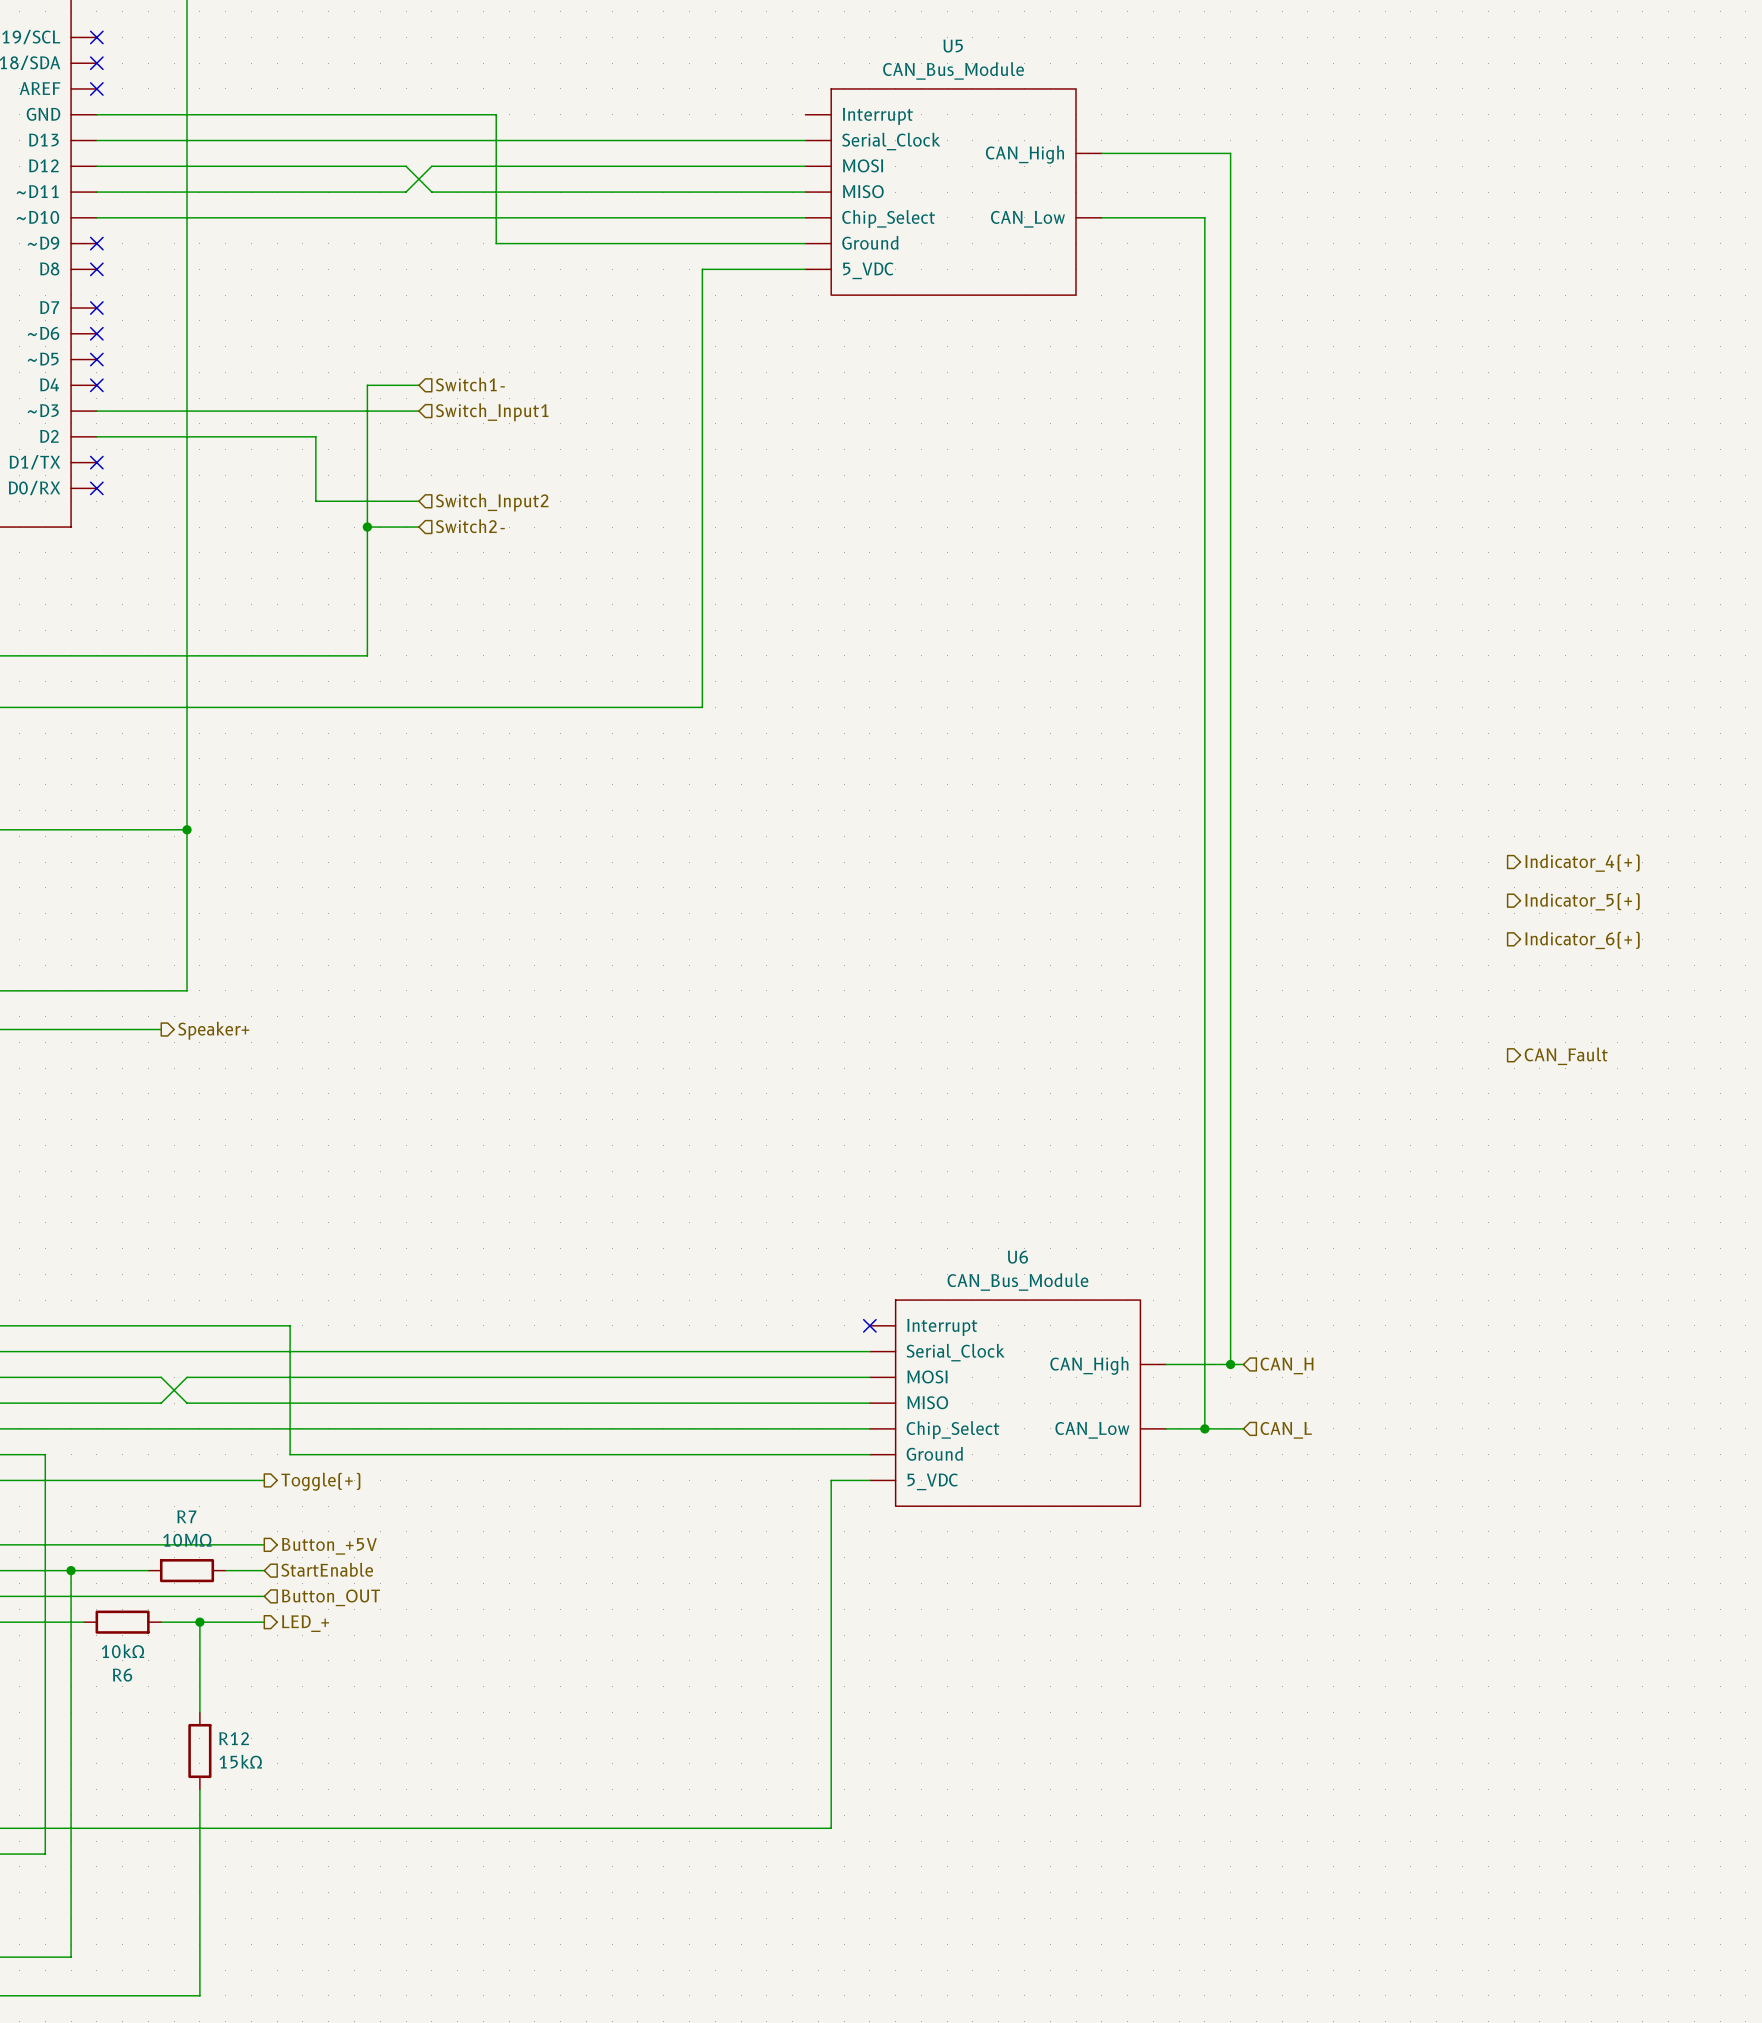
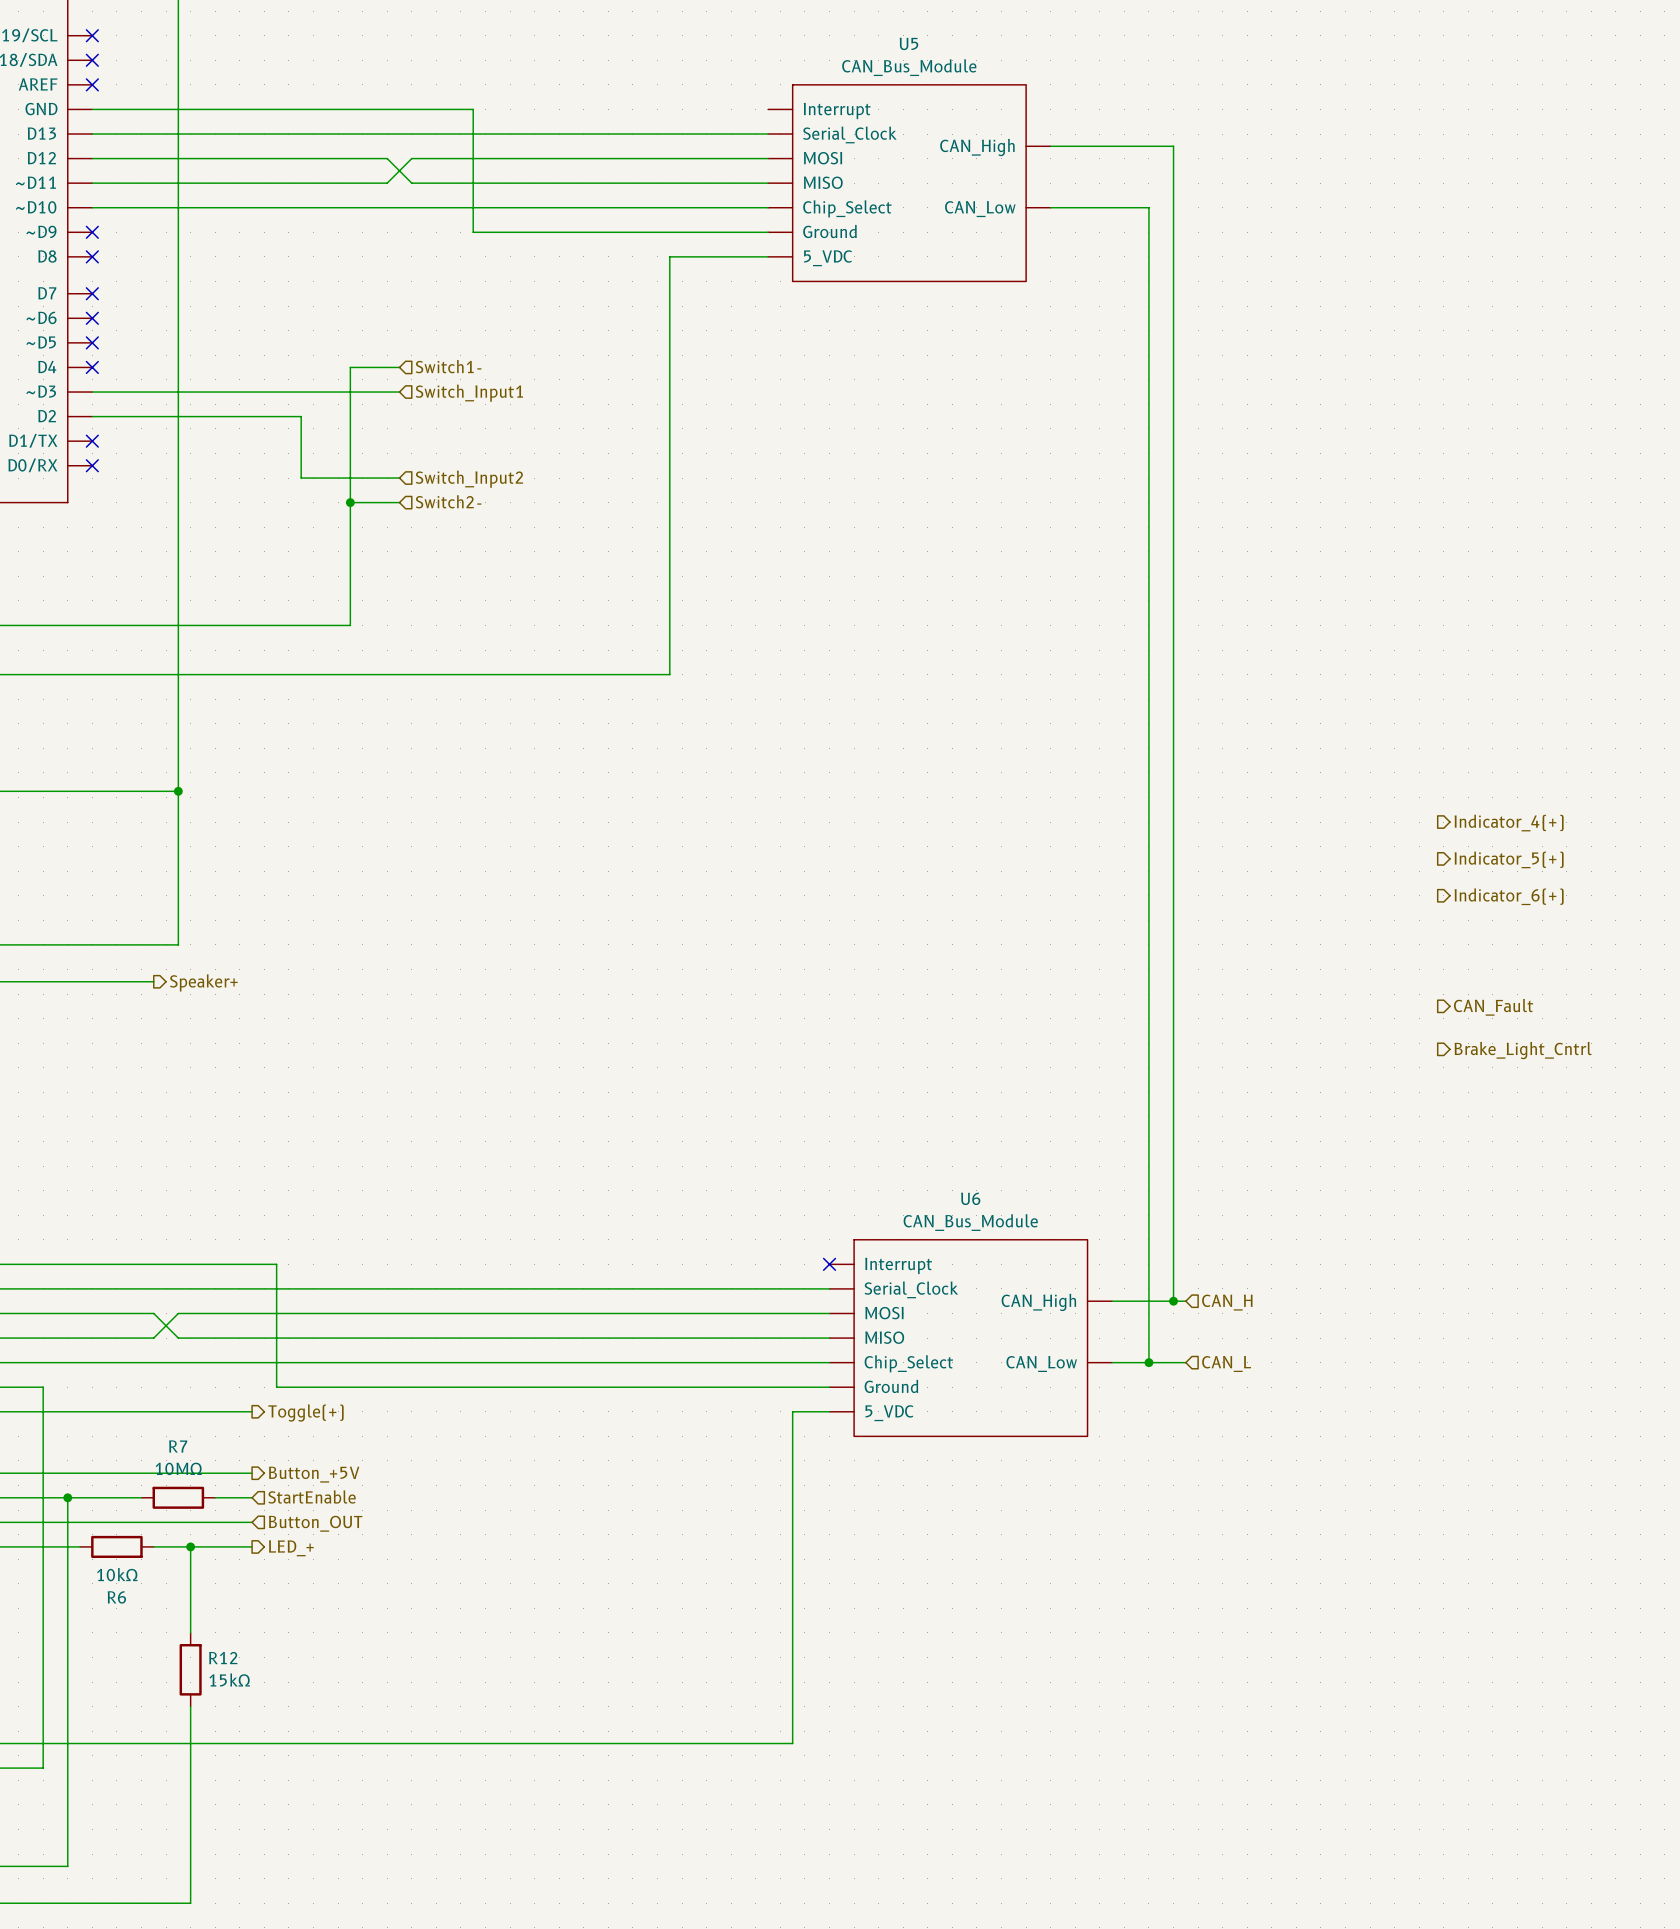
hierarchical label: none -> Brake_Light_Cntrl (1523, 1050)

